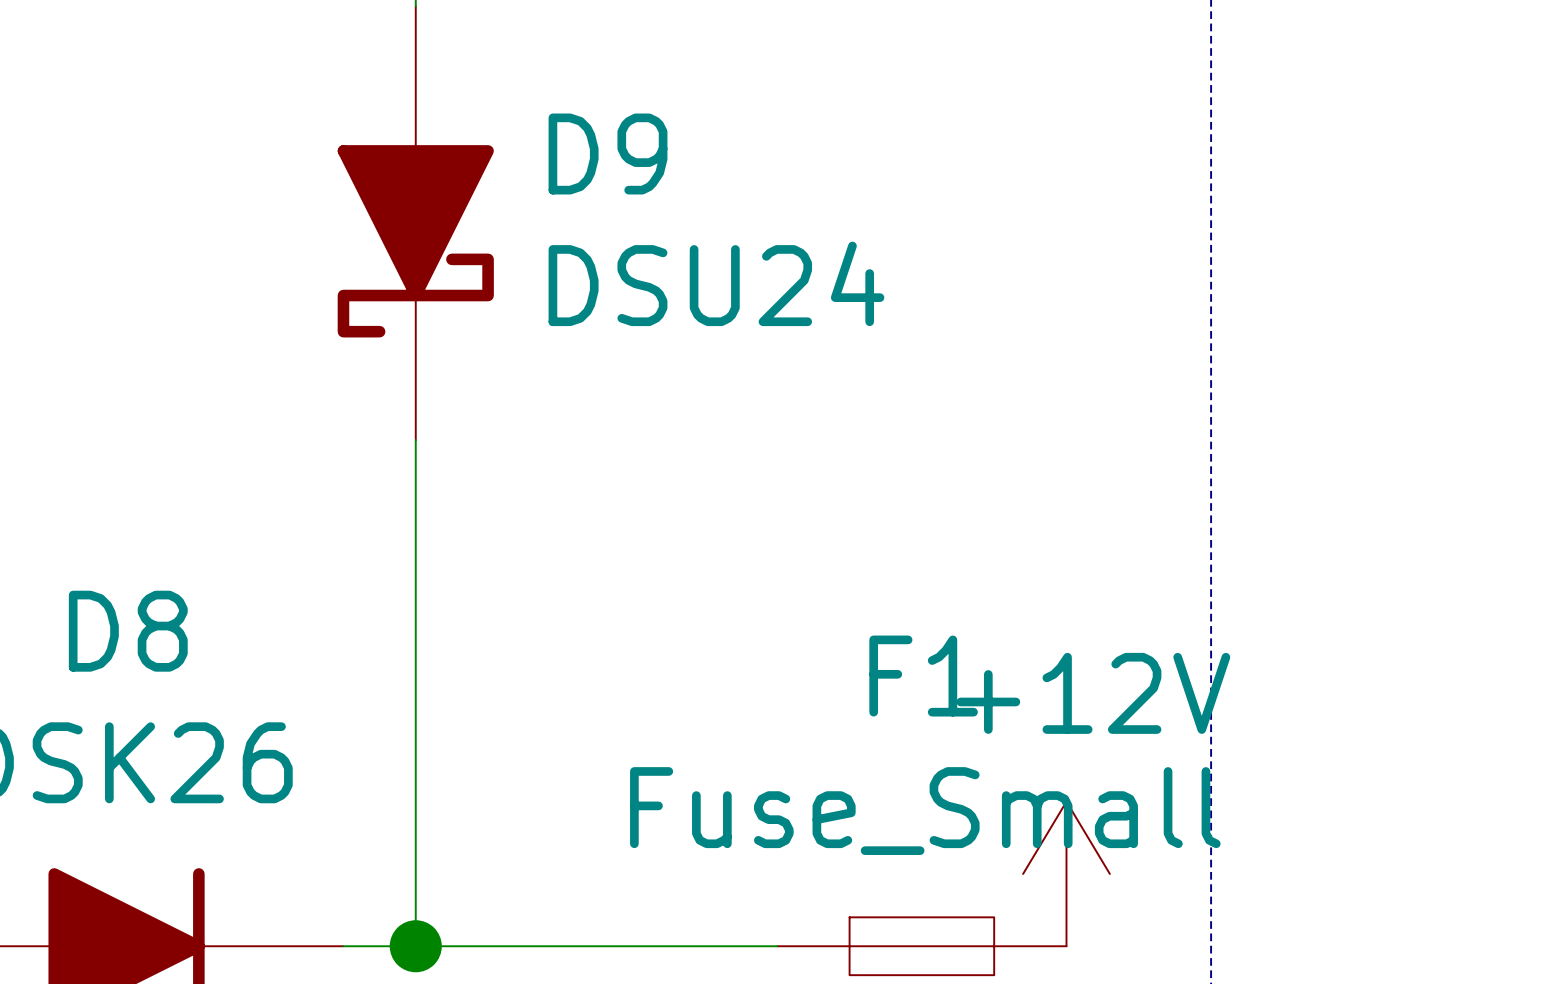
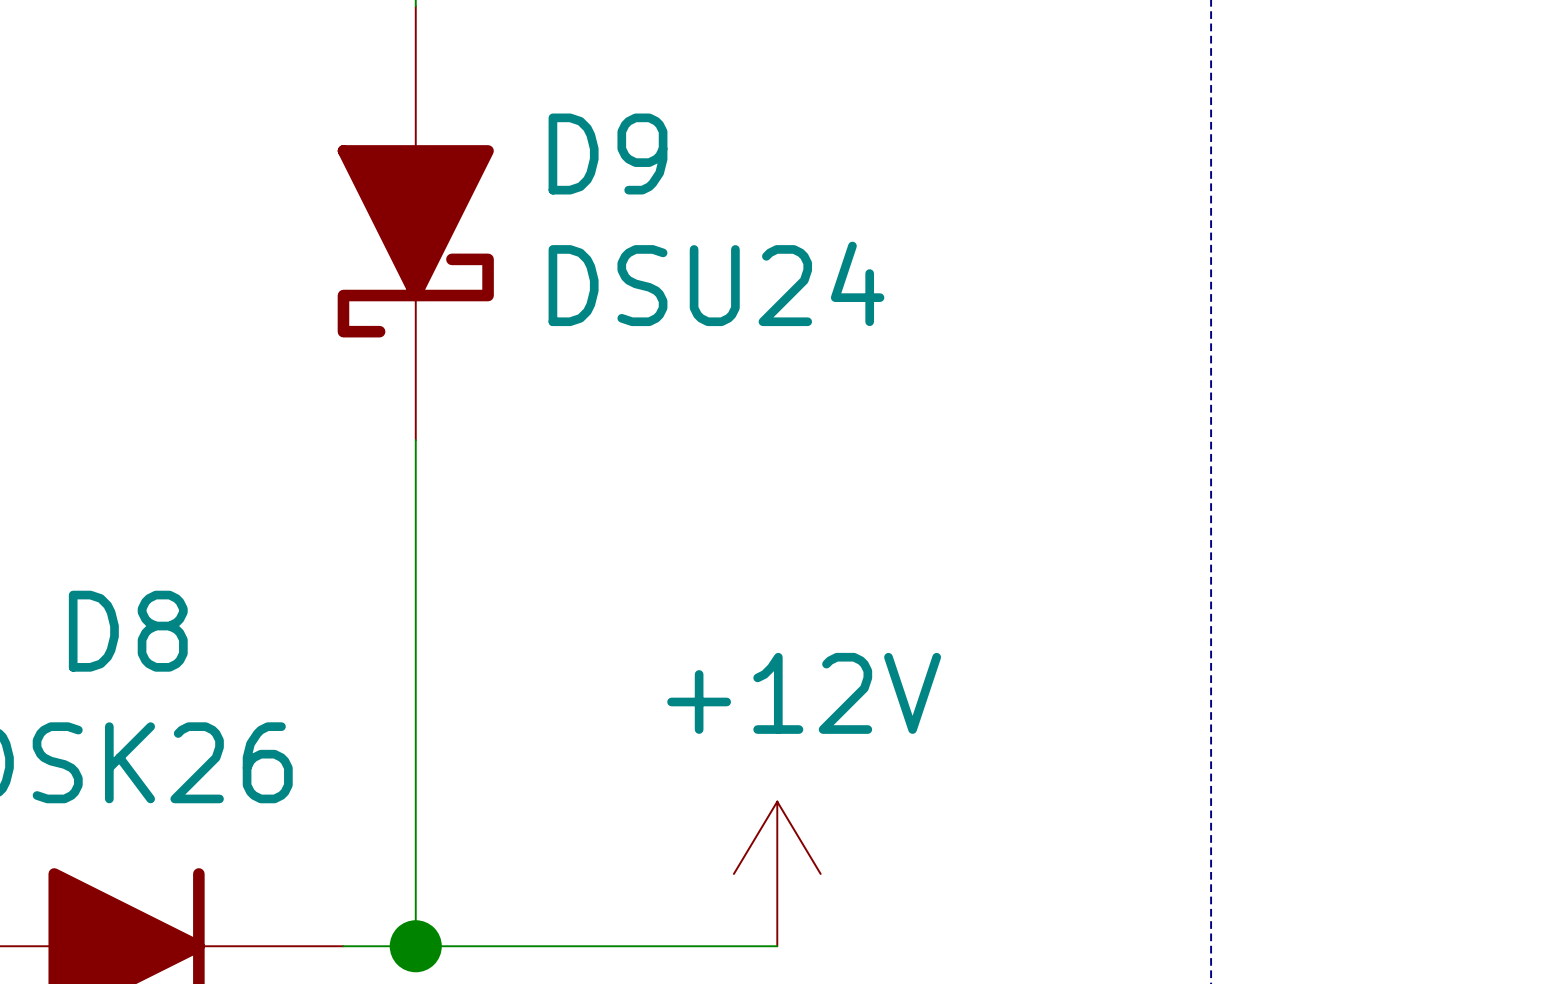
power symbol position: +12V (1066, 873) -> +12V (777, 873)
F1: Fuse_Small (921, 946) -> none

